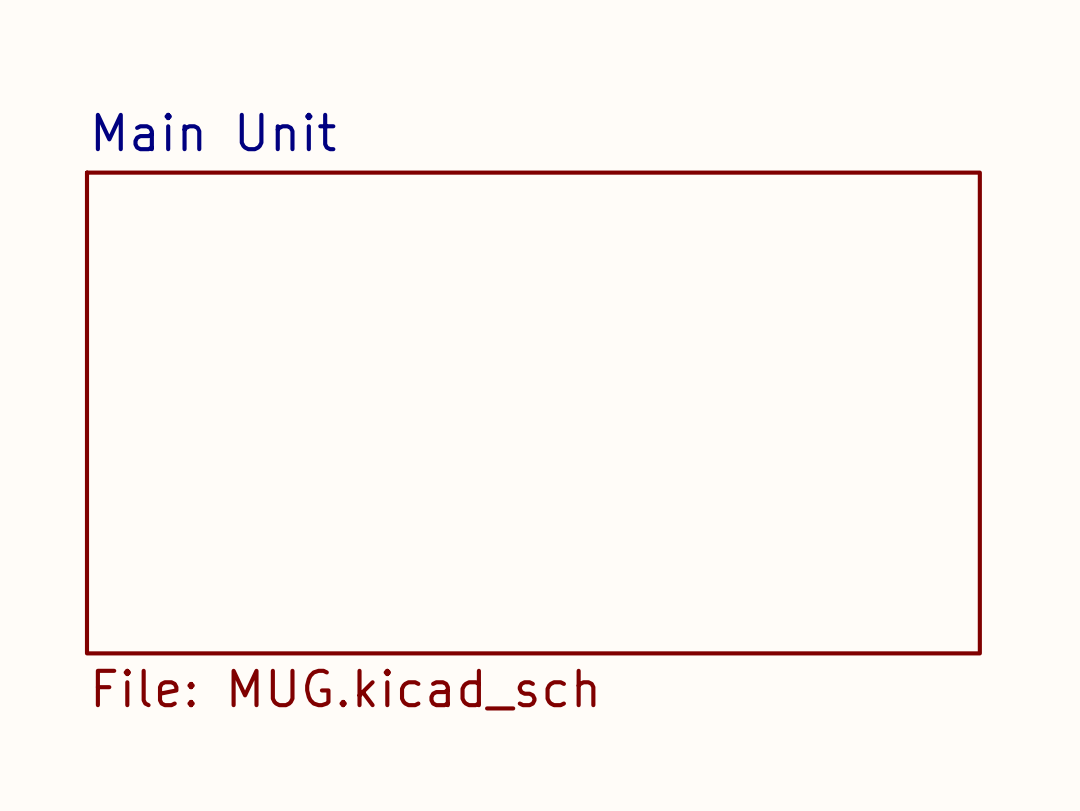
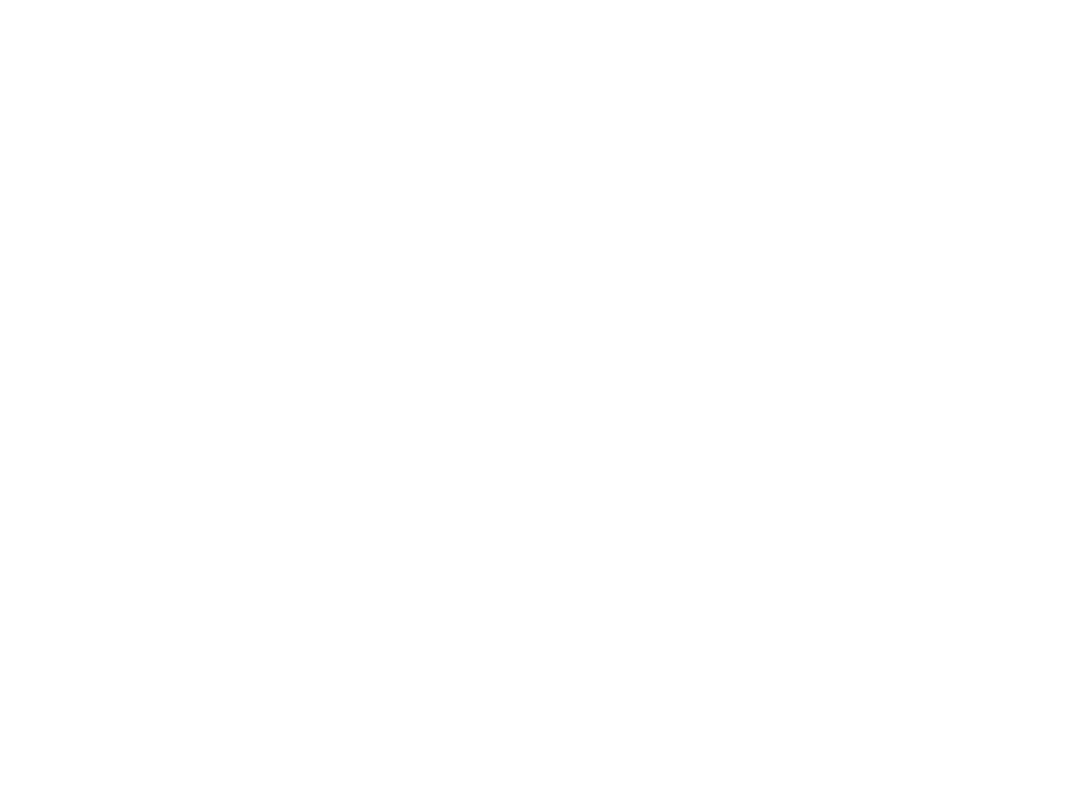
sheet Main Unit: File: MUG.kicad_sch (533, 413) -> none

